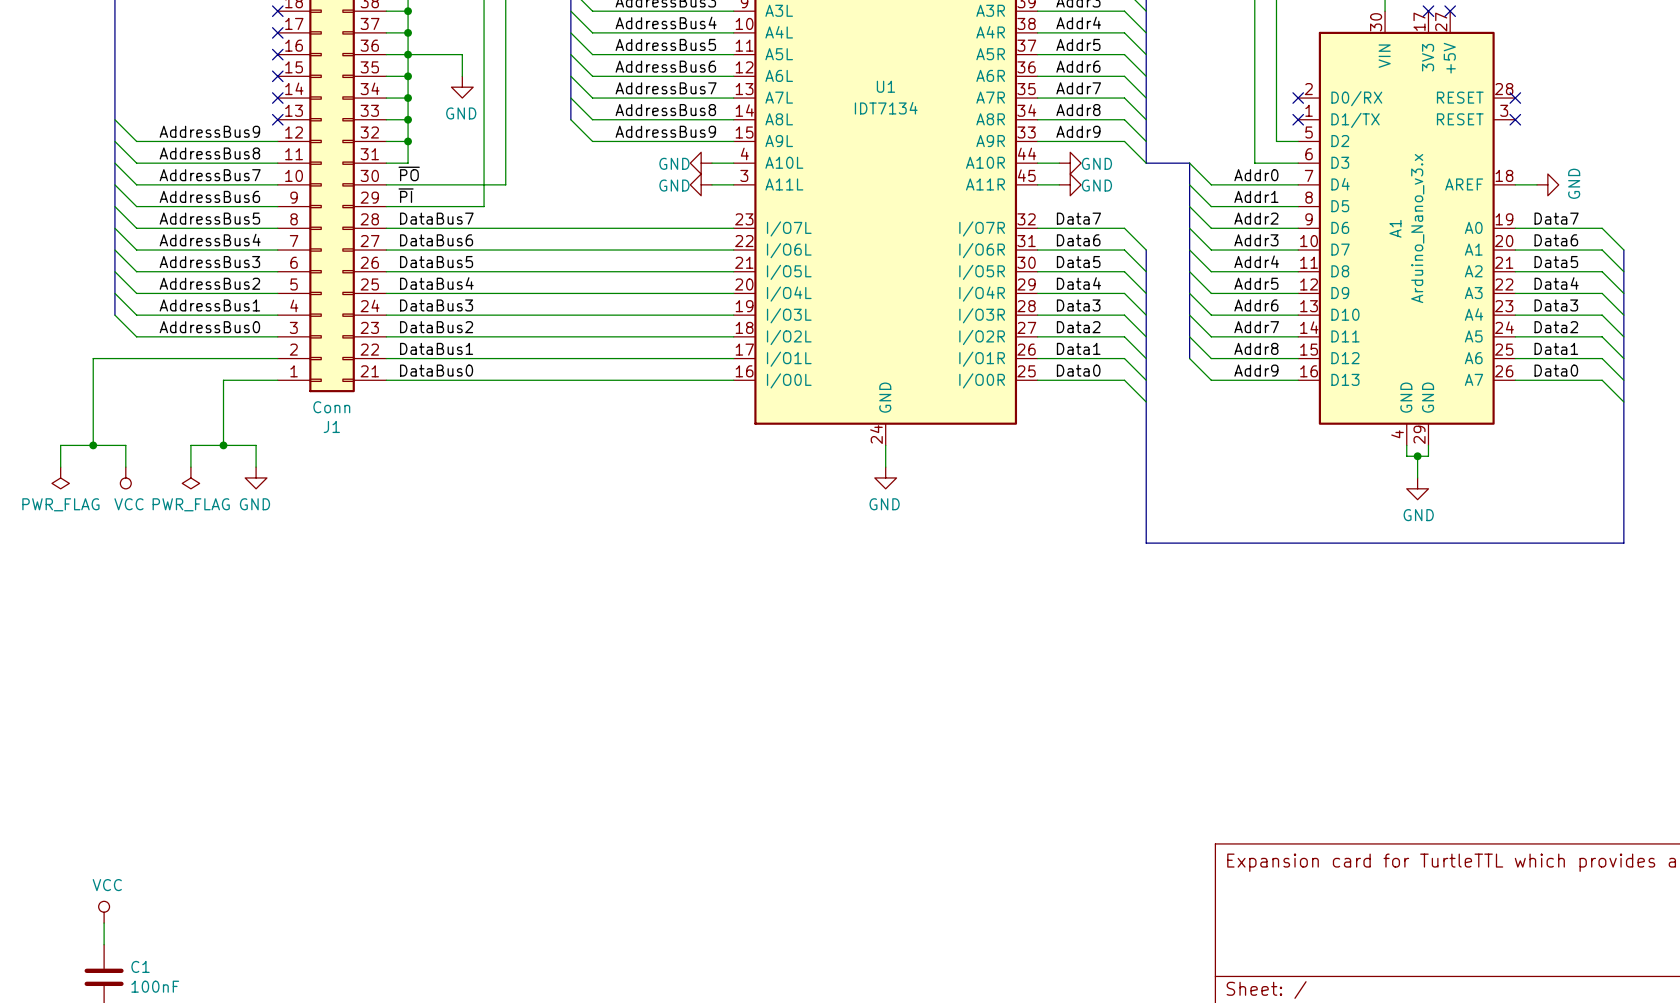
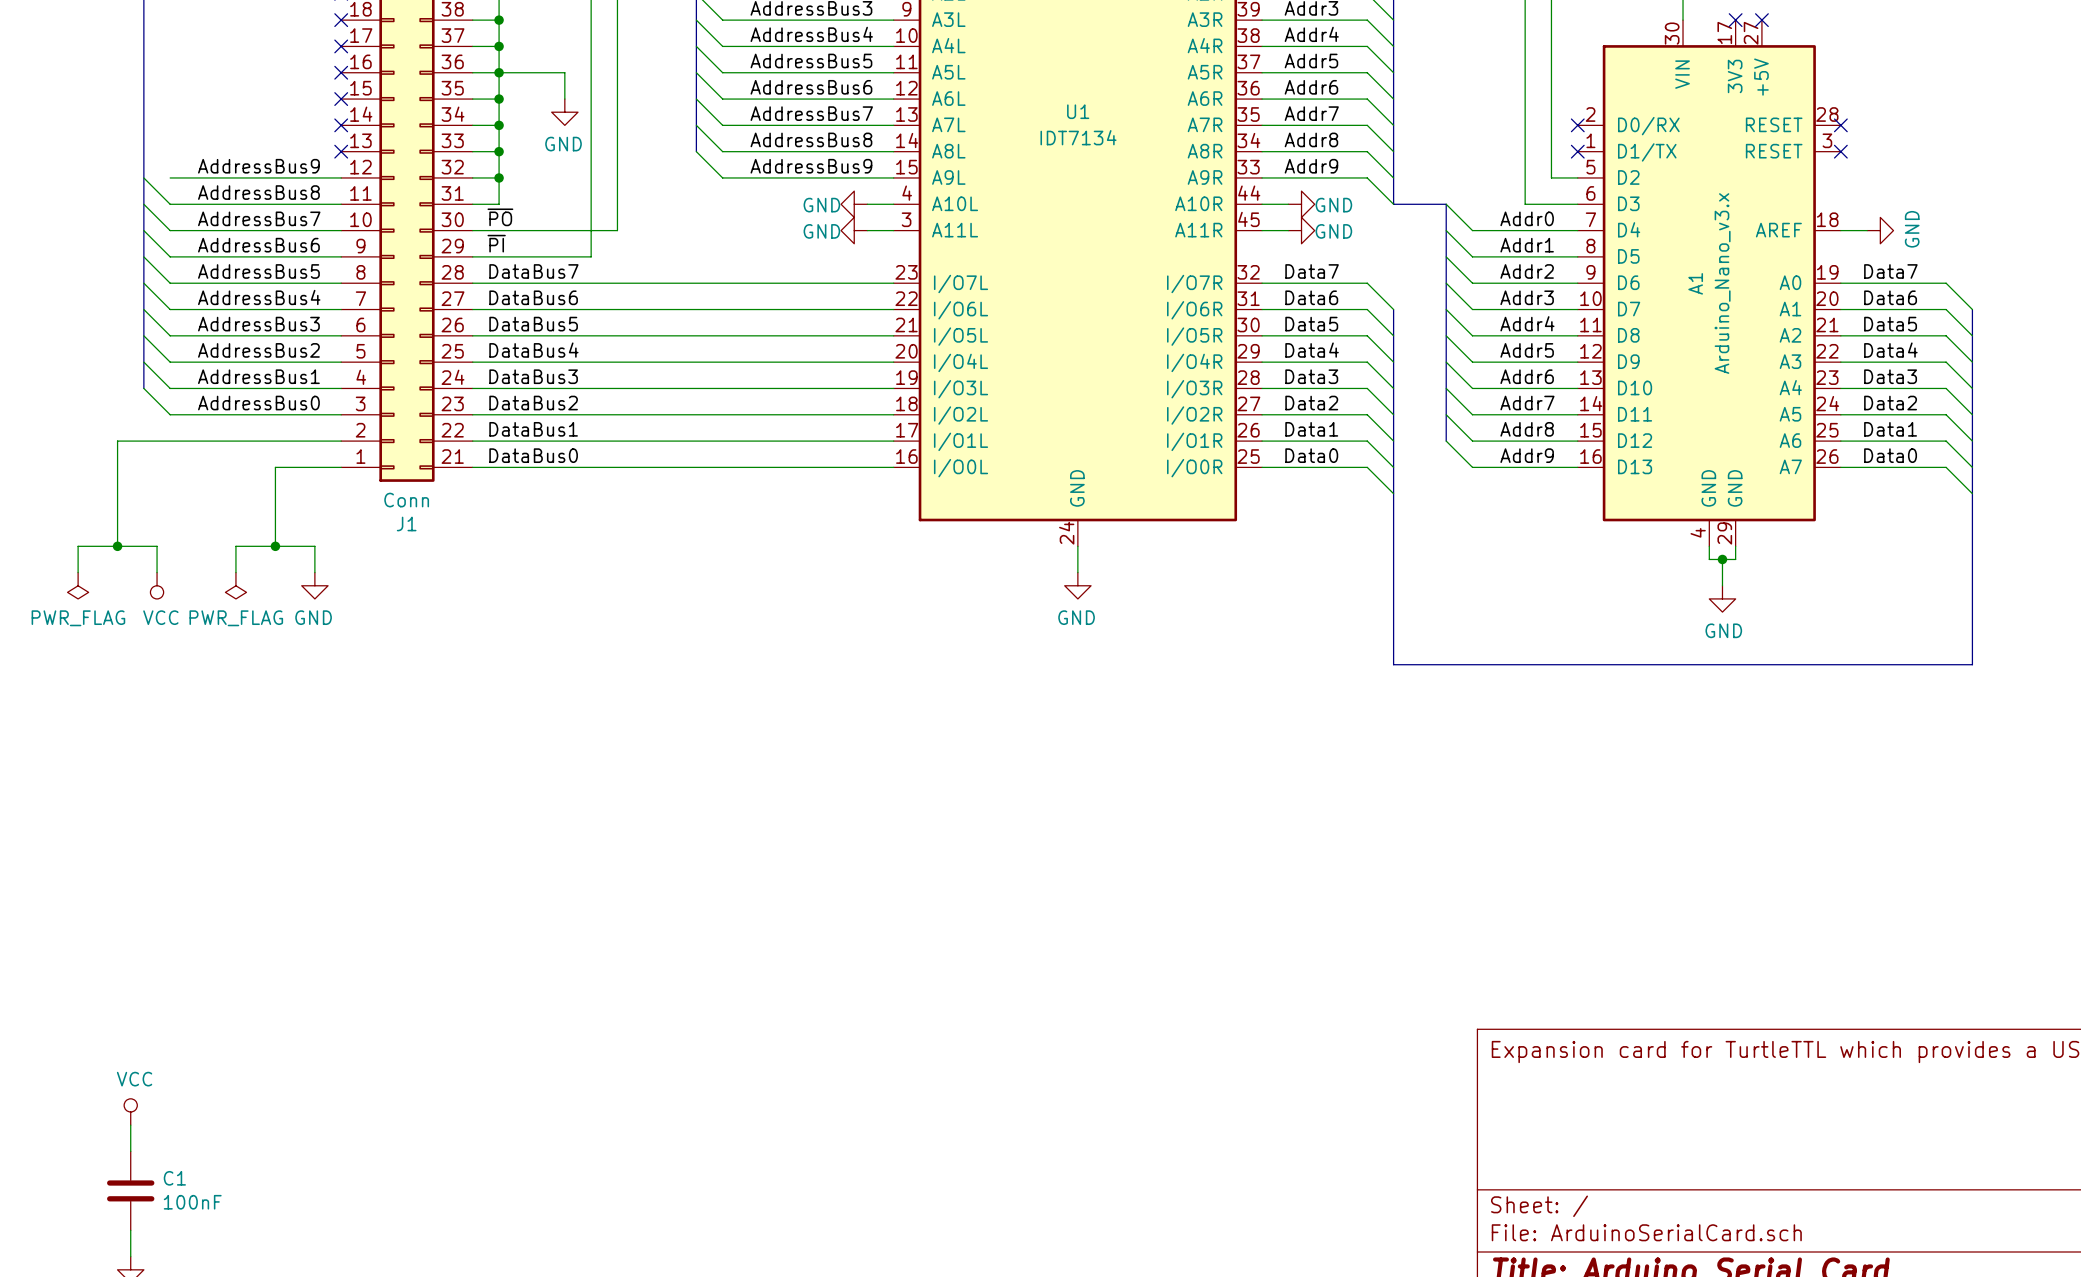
wire: (114, 119) (136, 141) -> none

